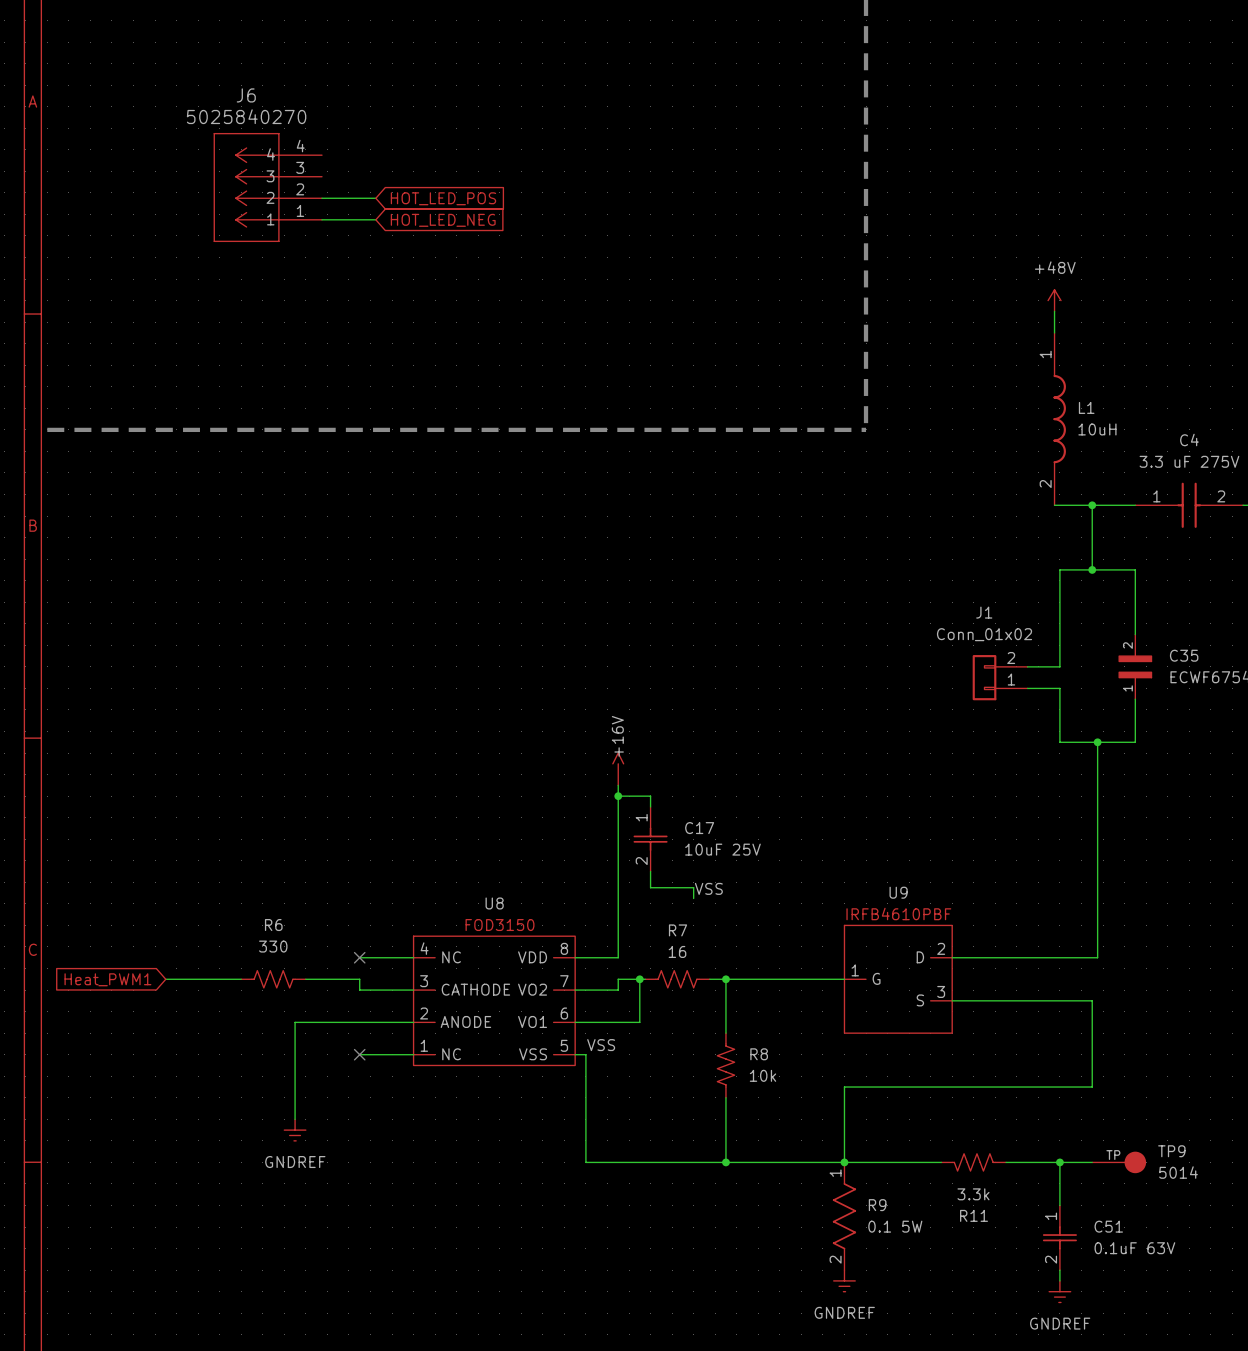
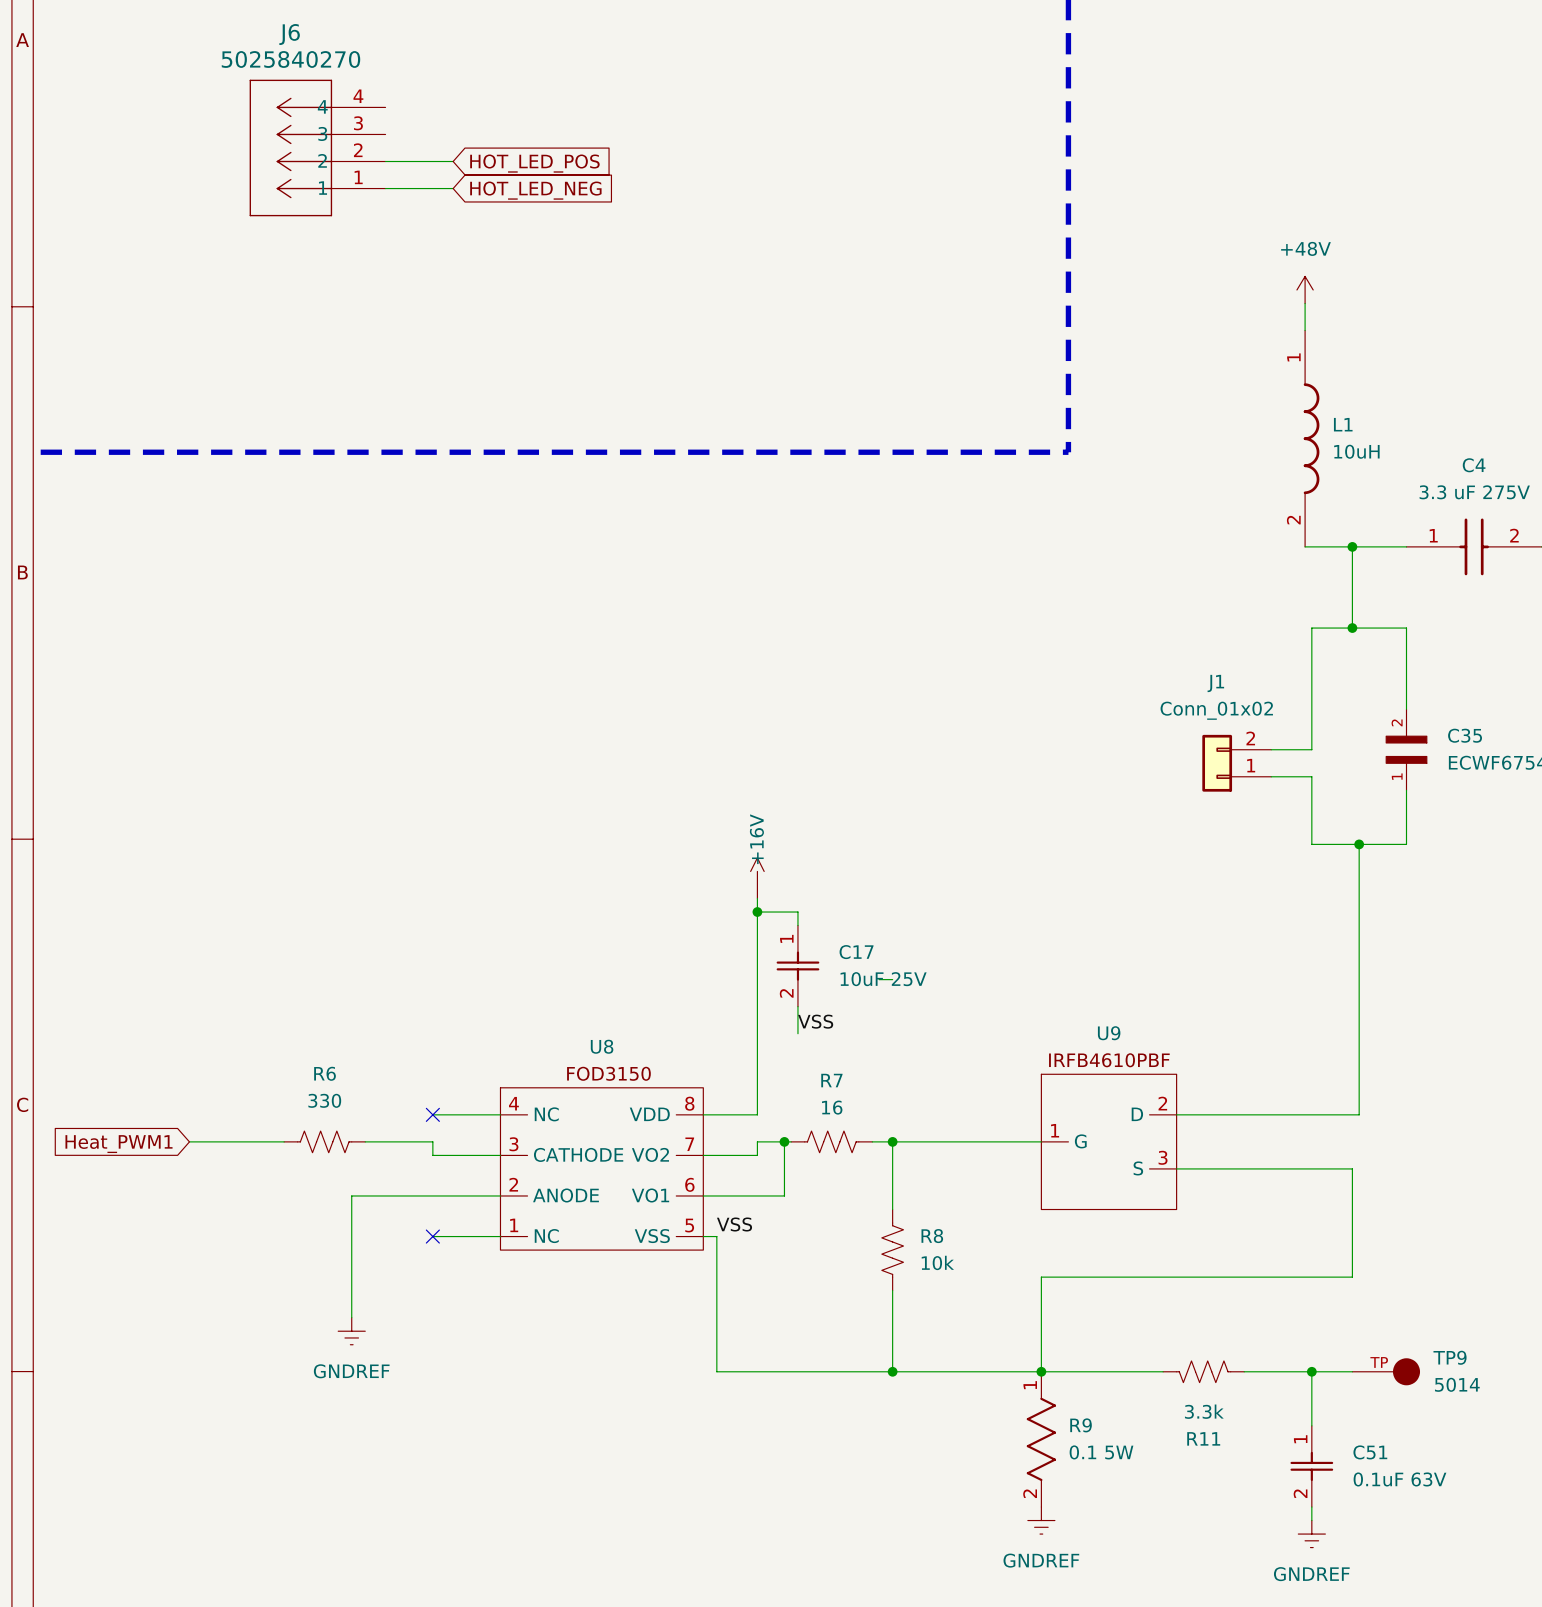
wire: none -> (879, 979) (892, 979)
wire: (650, 887) (693, 887) (693, 898) -> (797, 1026) (797, 1033)
label position: VSS (708, 888) -> VSS (815, 1021)

